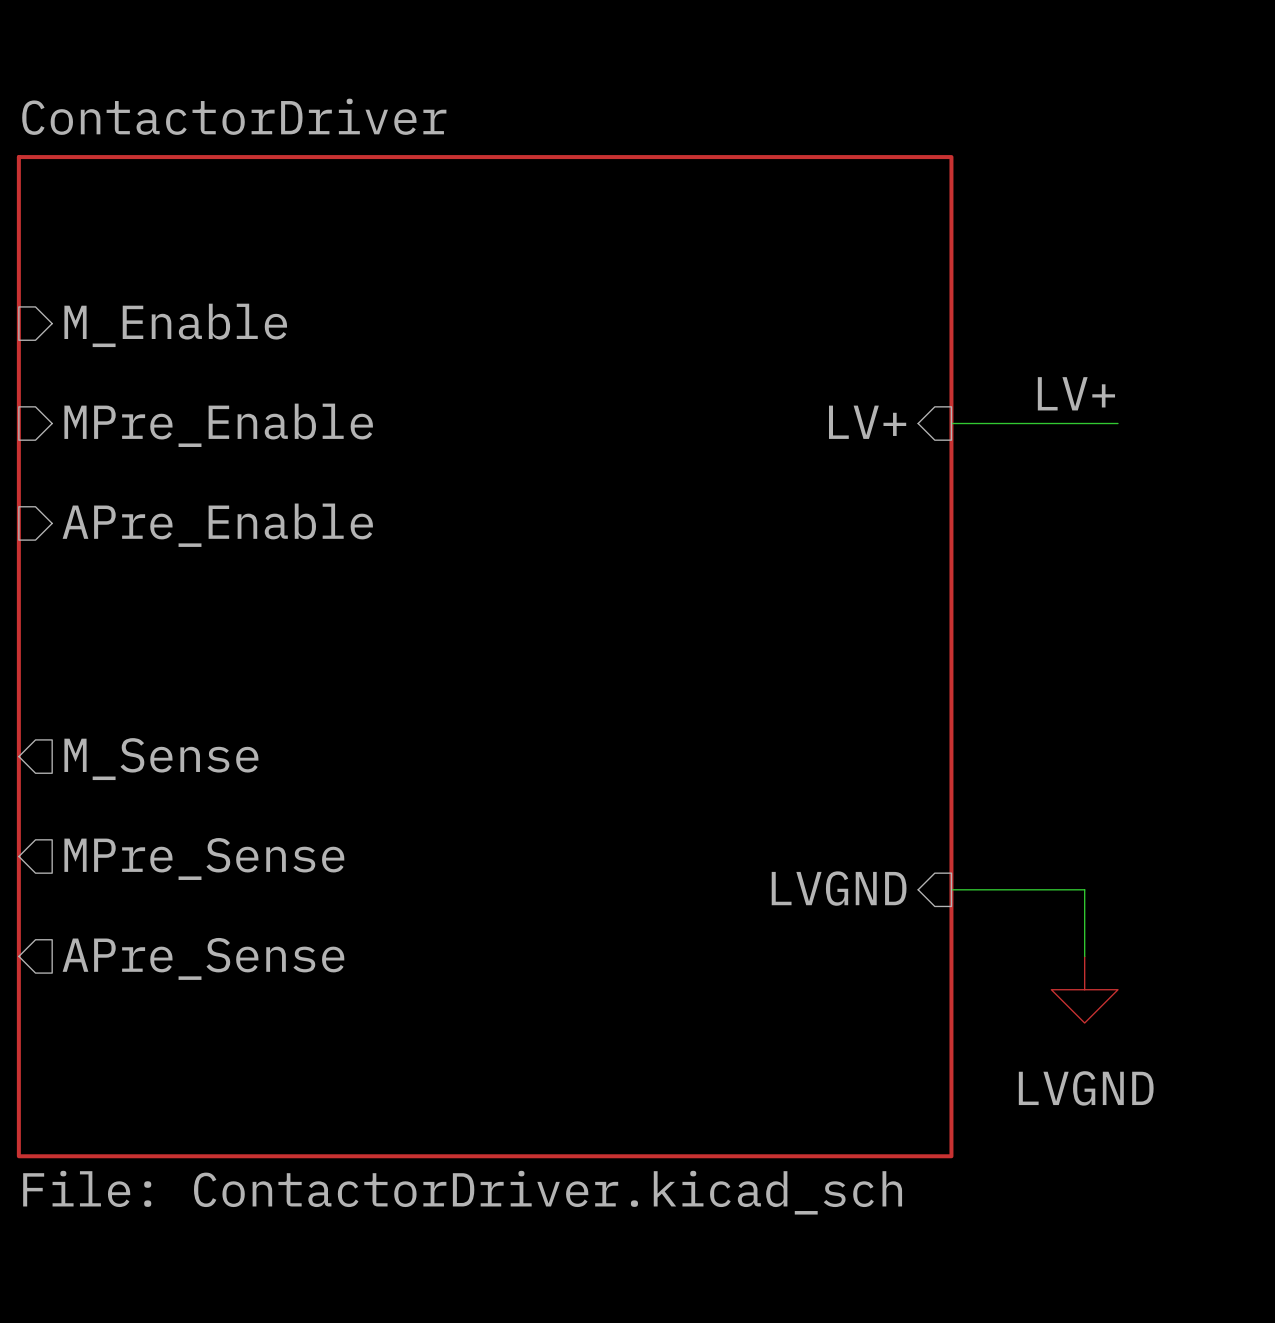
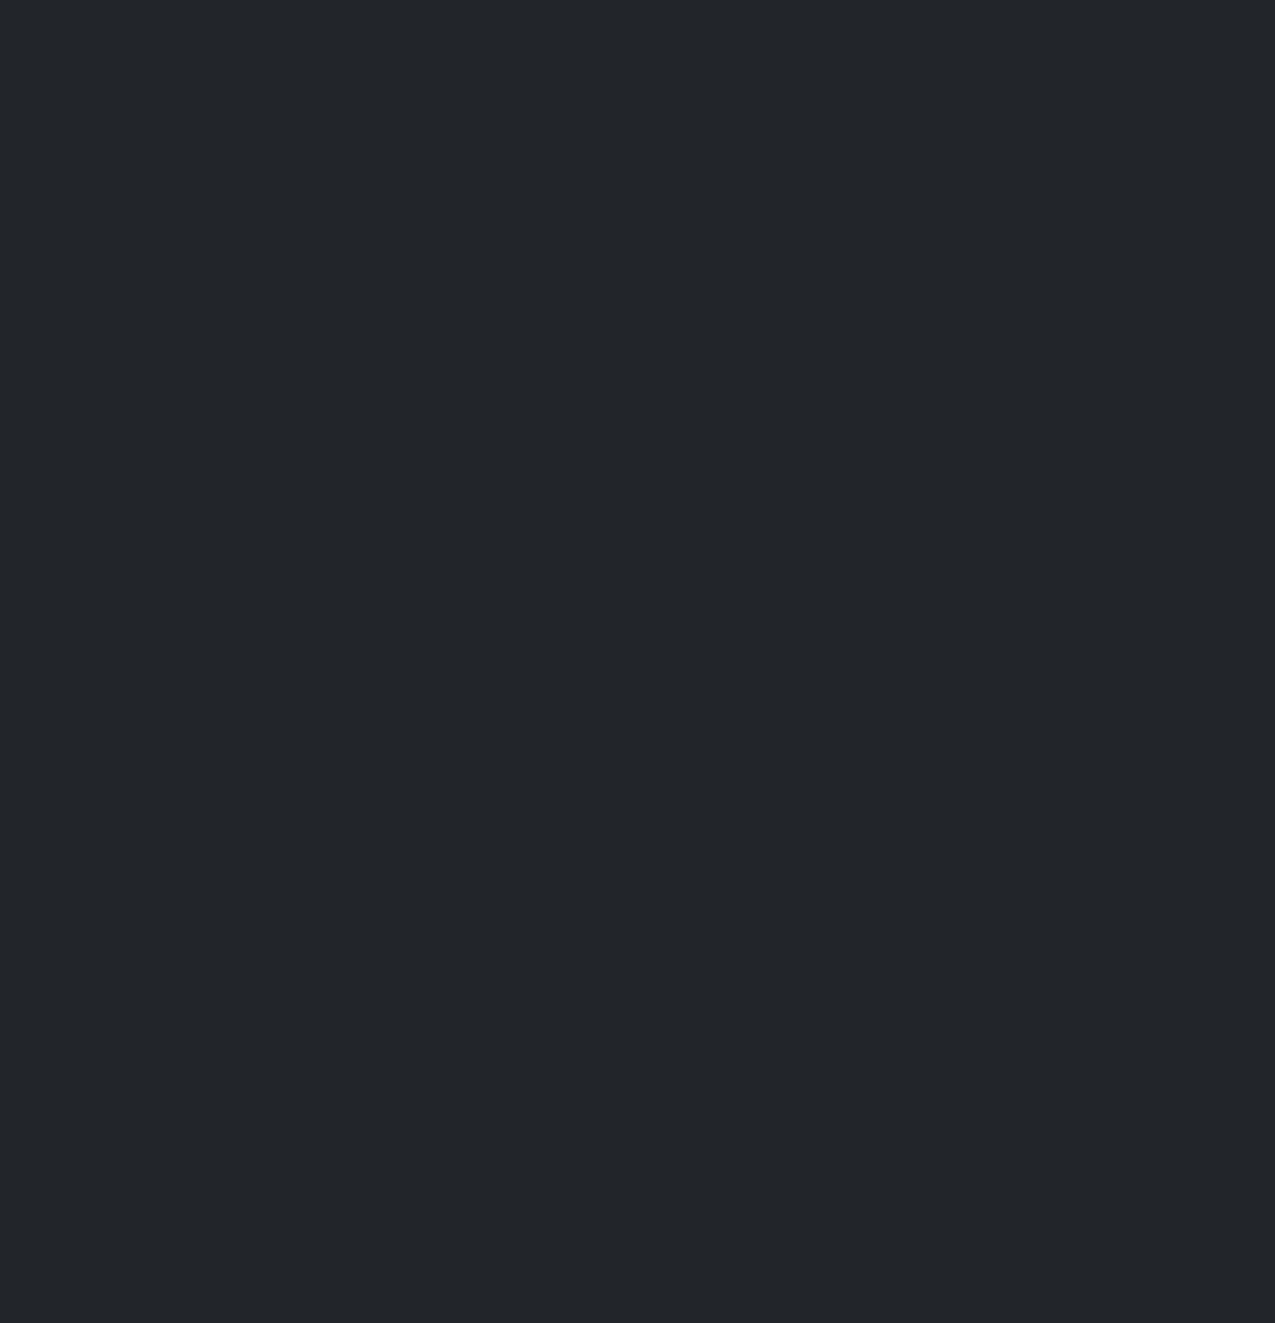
sheet pin: M_Enable (175, 325) -> none
label: LV+ (1076, 393) -> none
sheet pin: LV+ (867, 422) -> none
wire: (951, 423) (1117, 423) -> none
sheet pin: MPre_Enable (218, 425) -> none
sheet pin: APre_Enable (217, 525) -> none
sheet ContactorDriver: File: ContactorDriver.kicad_sch (485, 656) -> none
sheet pin: M_Sense (161, 759) -> none
sheet pin: MPre_Sense (204, 859) -> none
sheet pin: LVGND (839, 888) -> none
wire: (951, 889) (1084, 889) (1084, 956) -> none
sheet pin: APre_Sense (203, 958) -> none
power symbol: LVGND (1084, 989) -> none

